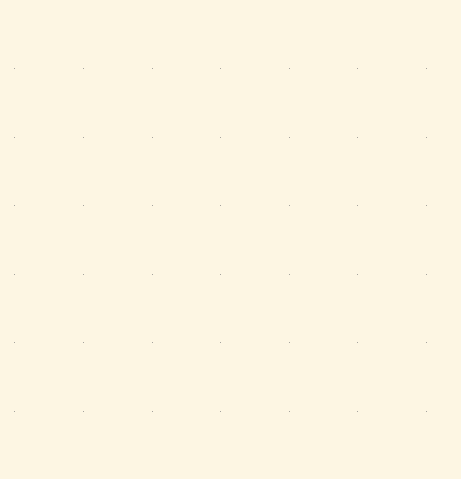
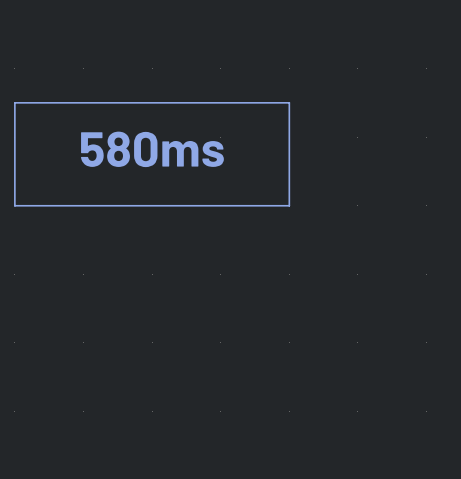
line: none -> (14, 102) (289, 102) (289, 205) (14, 205) (14, 102)
text: none -> 580ms (152, 149)

